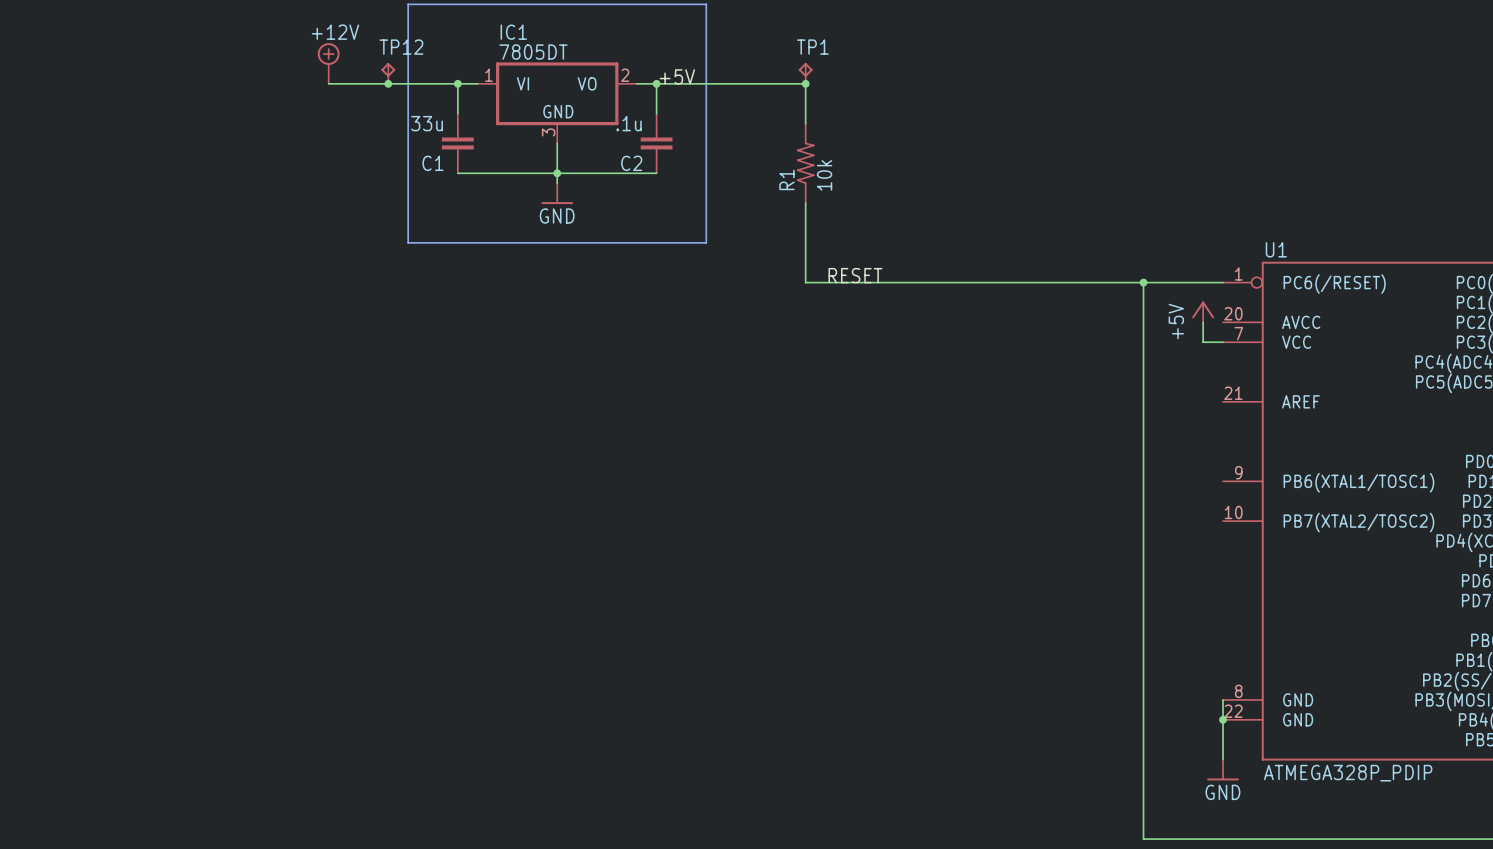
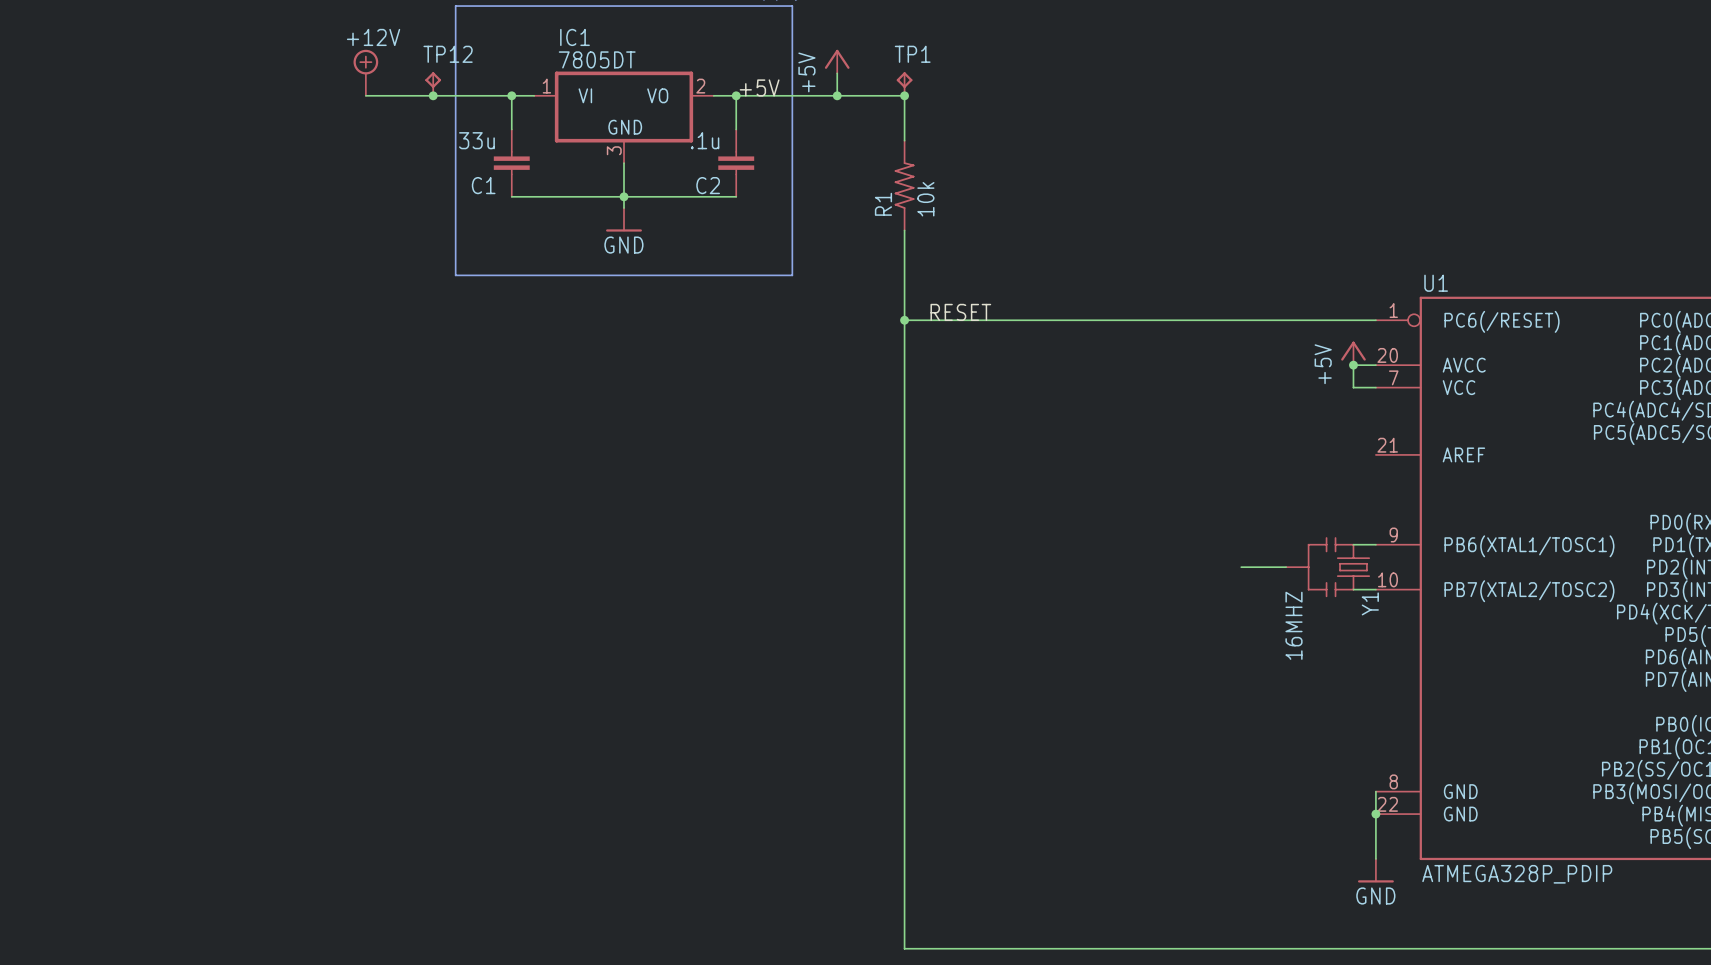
power symbol: none -> +5V (837, 61)
wire: none -> (837, 73) (837, 95)
junction: none -> (837, 95)
junction: none -> (904, 320)
wire: (1143, 282) (1143, 839) -> (904, 320) (904, 948) (1286, 948)
junction: (1143, 282) -> none
wire: none -> (1353, 365) (1375, 365)
junction: none -> (1353, 365)
wire: none -> (1353, 544) (1375, 544)
wire: none -> (1241, 567) (1286, 567)
Y1: none -> 16MHZ (1327, 567)
wire: none -> (1353, 589) (1375, 589)

